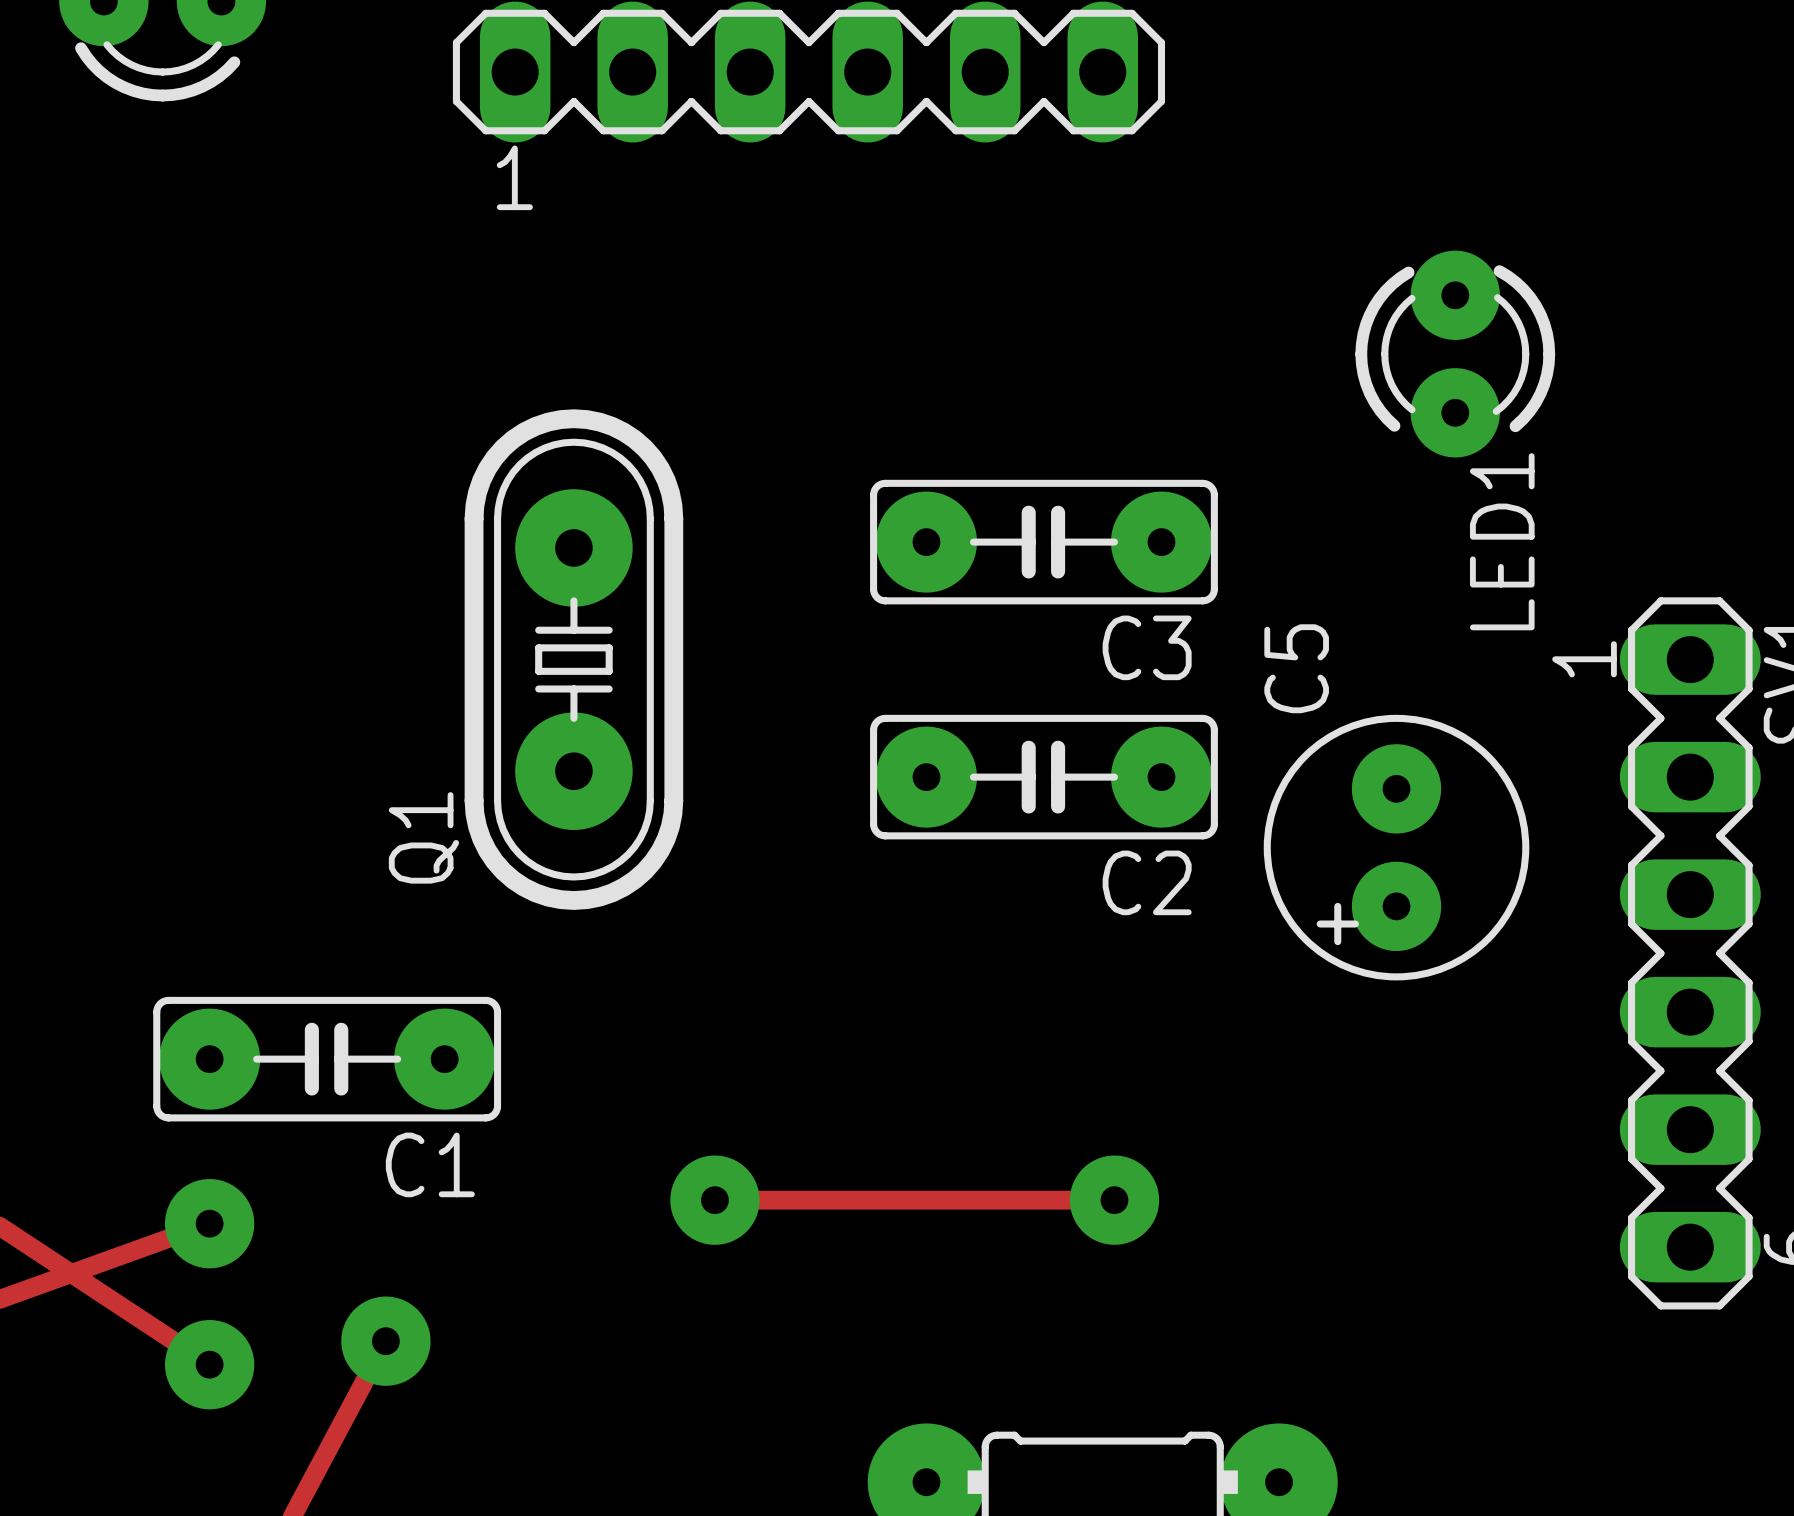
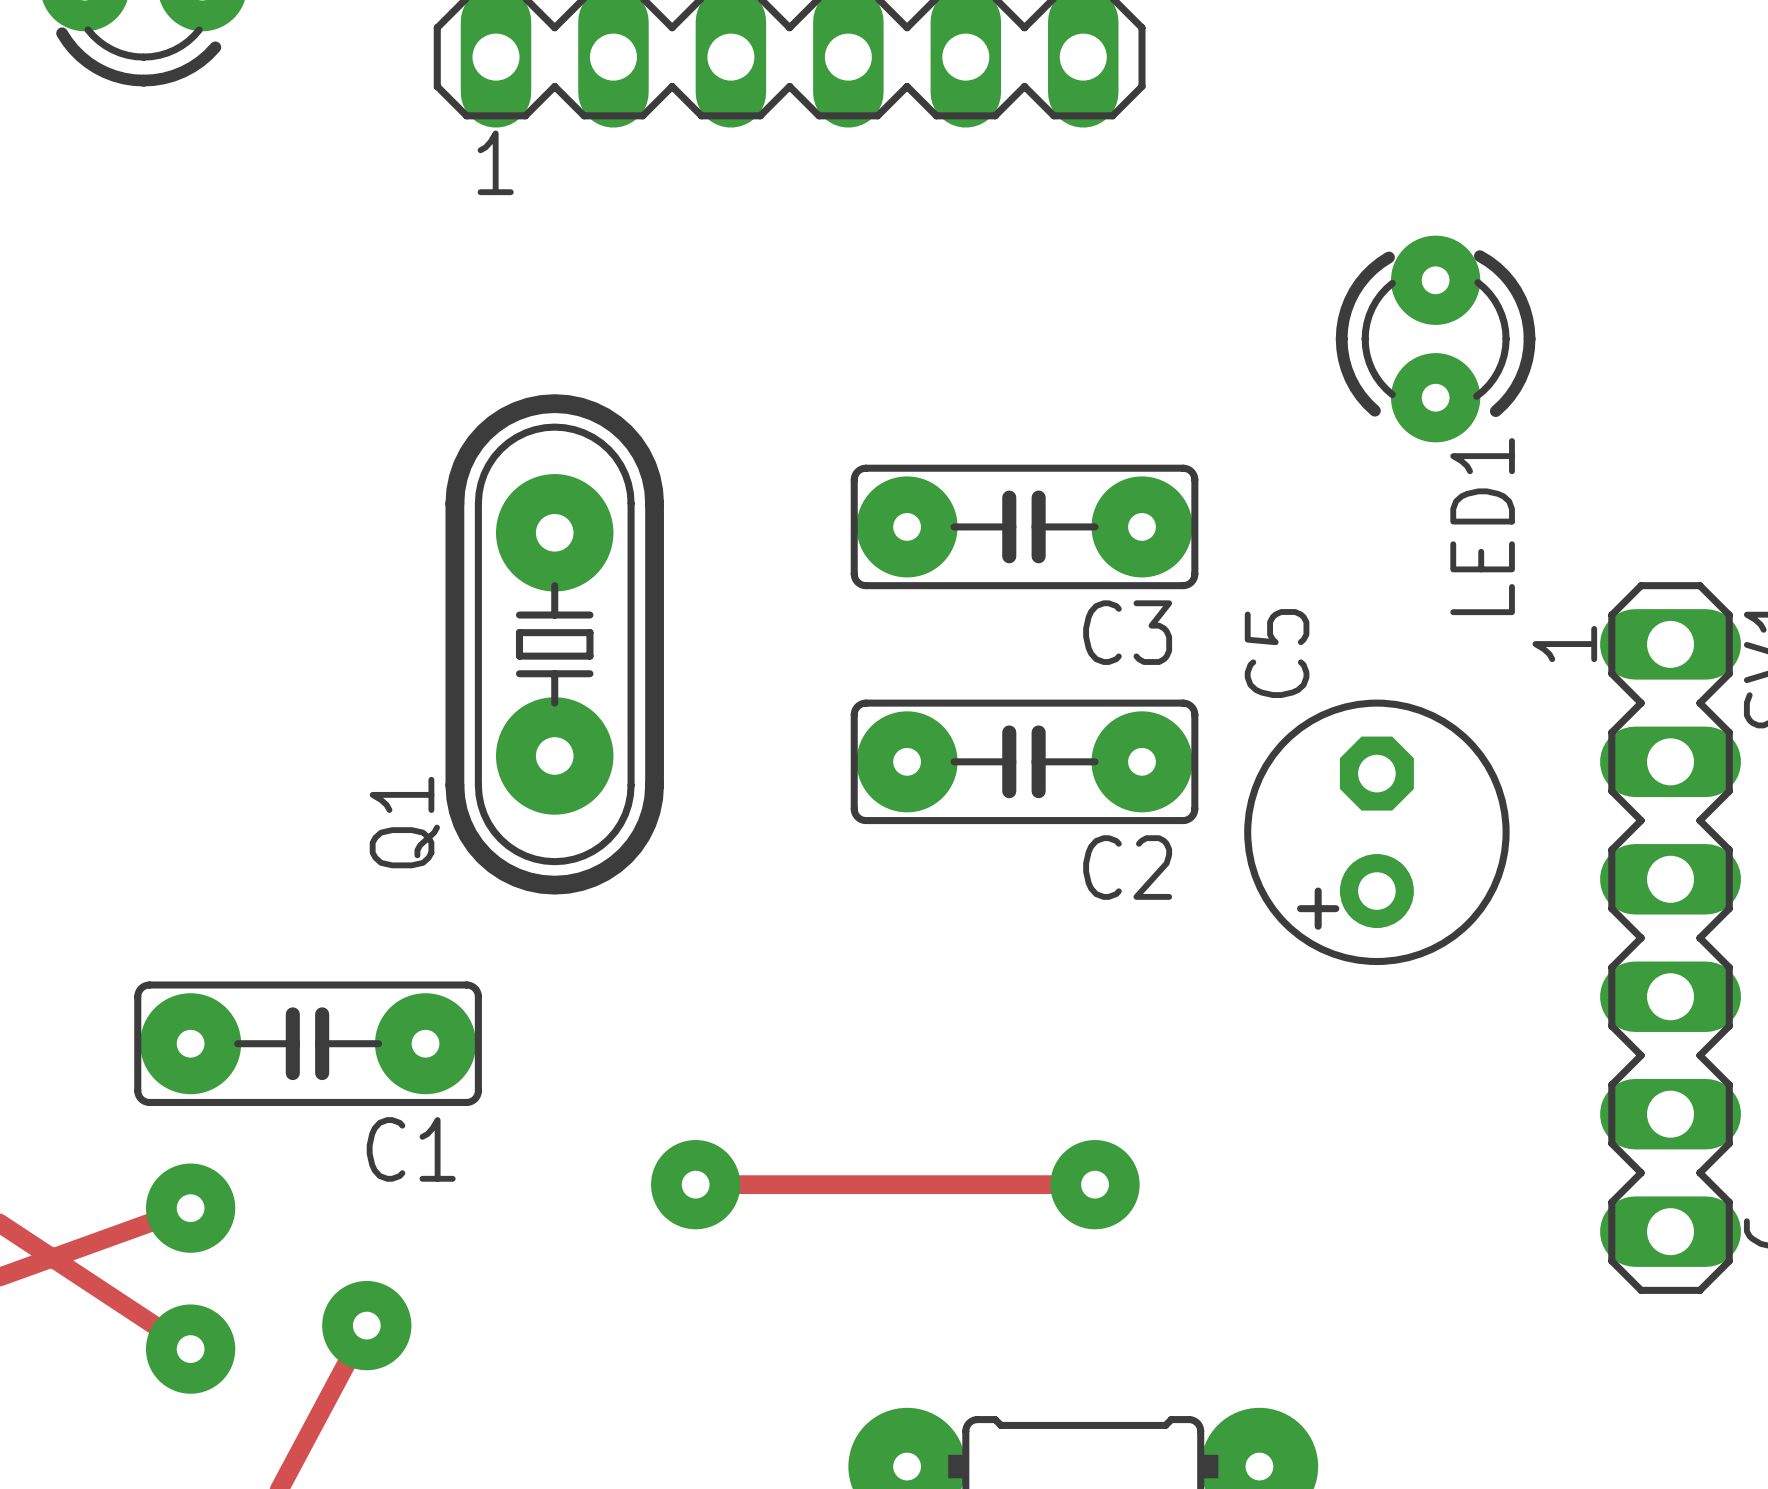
C5 footprint: [1263, 714, 1530, 981] -> [1244, 699, 1510, 966]

